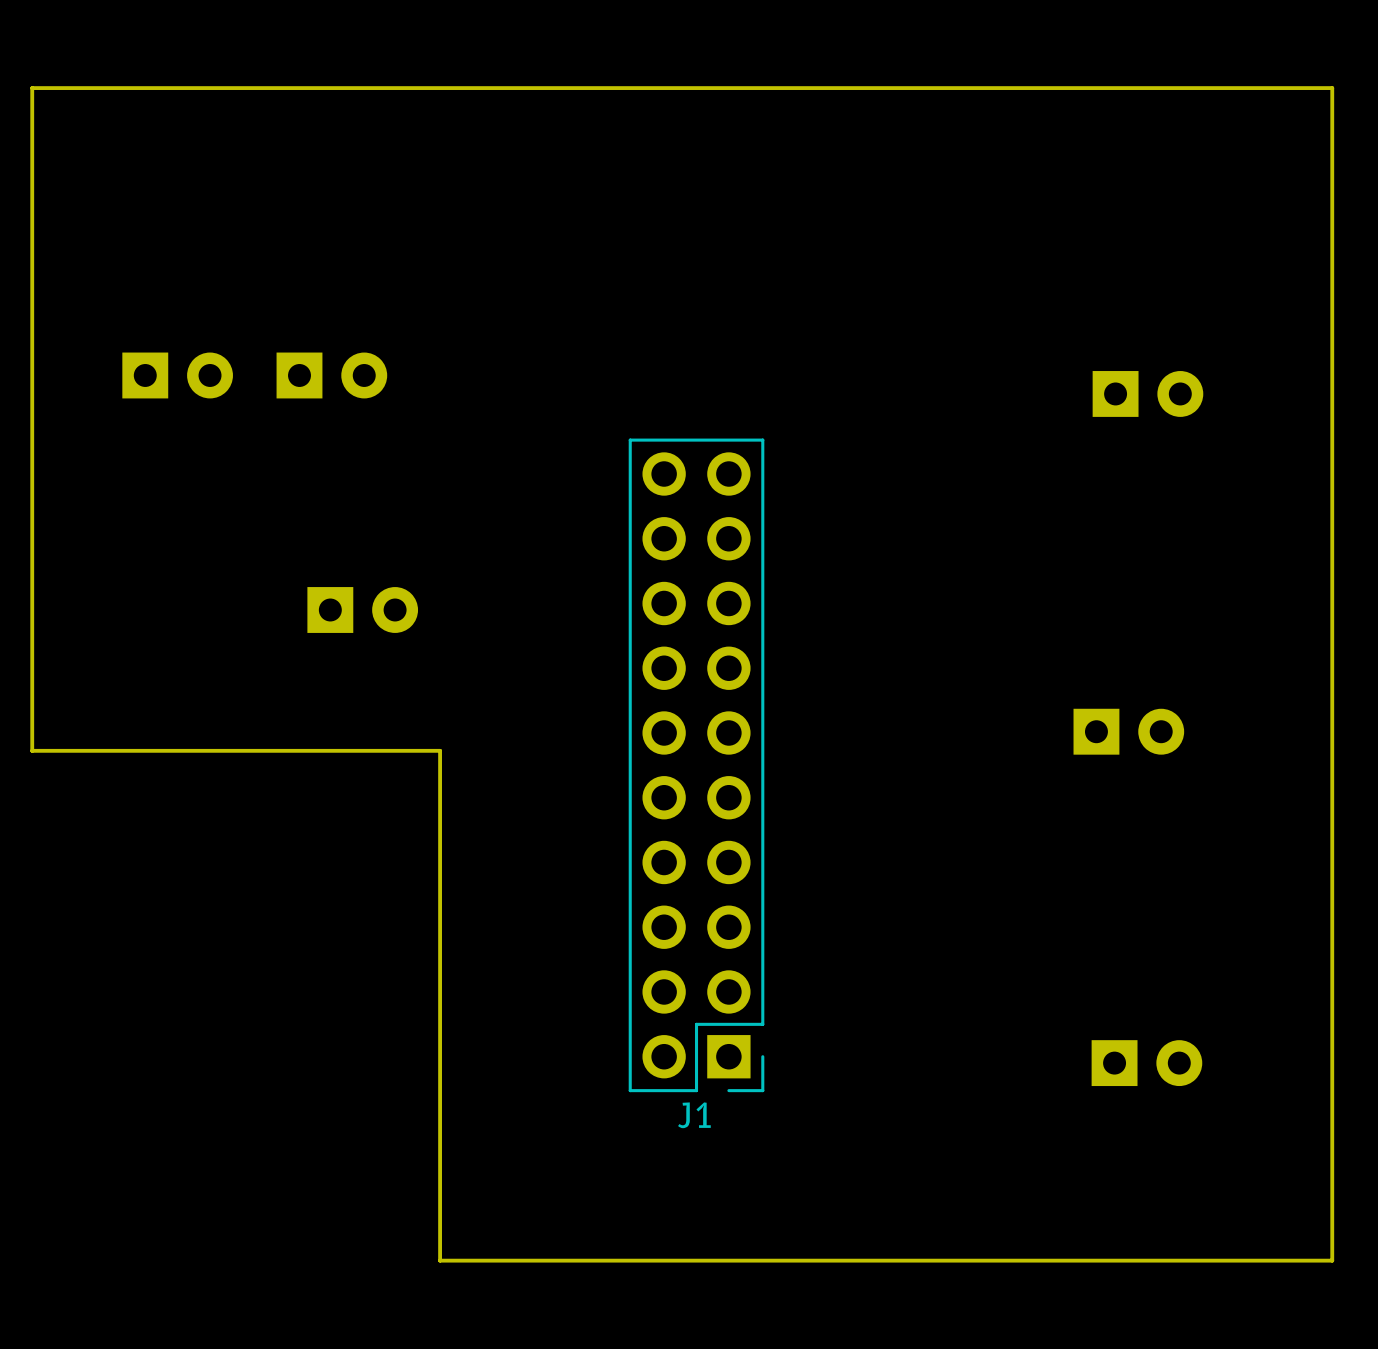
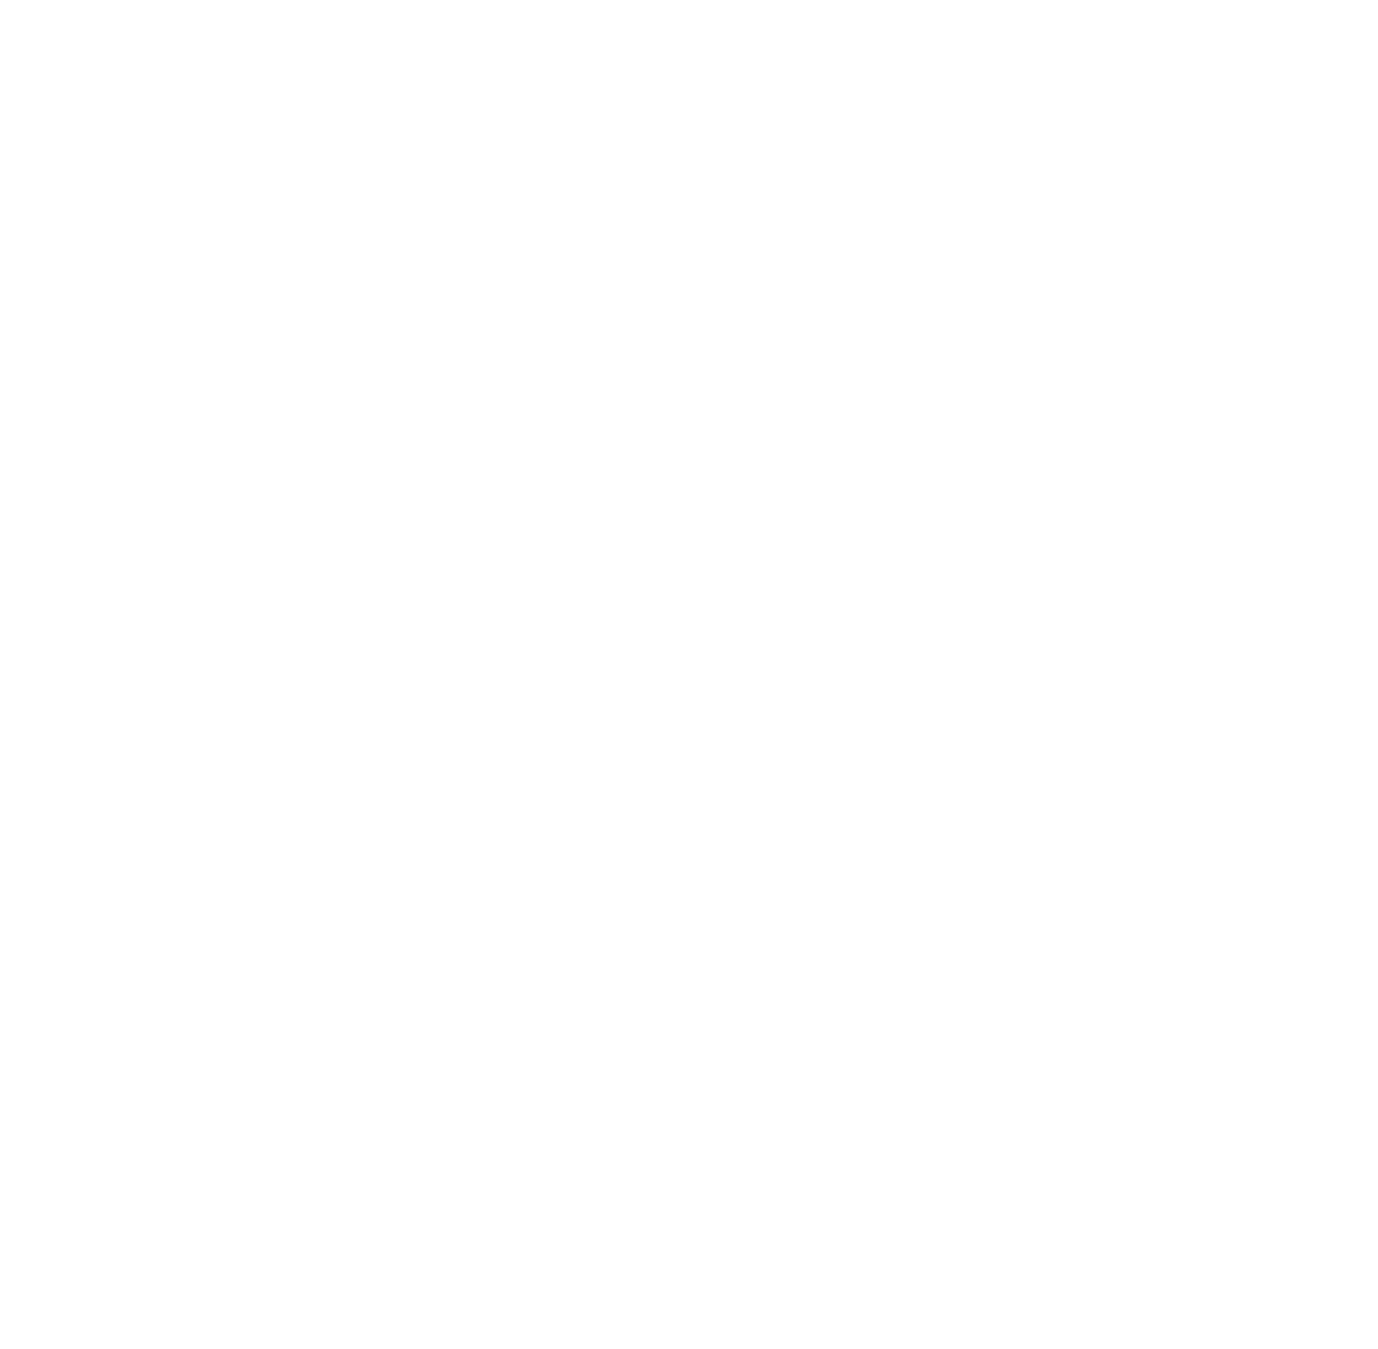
board edge: (1332, 88) (32, 88) (32, 750) (440, 750) (440, 1260) (1332, 1260) (1332, 88) -> none
part: (177, 375) -> none
part: (331, 375) -> none
part: (1147, 393) -> none
part: (362, 610) -> none
part: (1128, 731) -> none
J1: (696, 765) -> none
part: (1146, 1063) -> none

